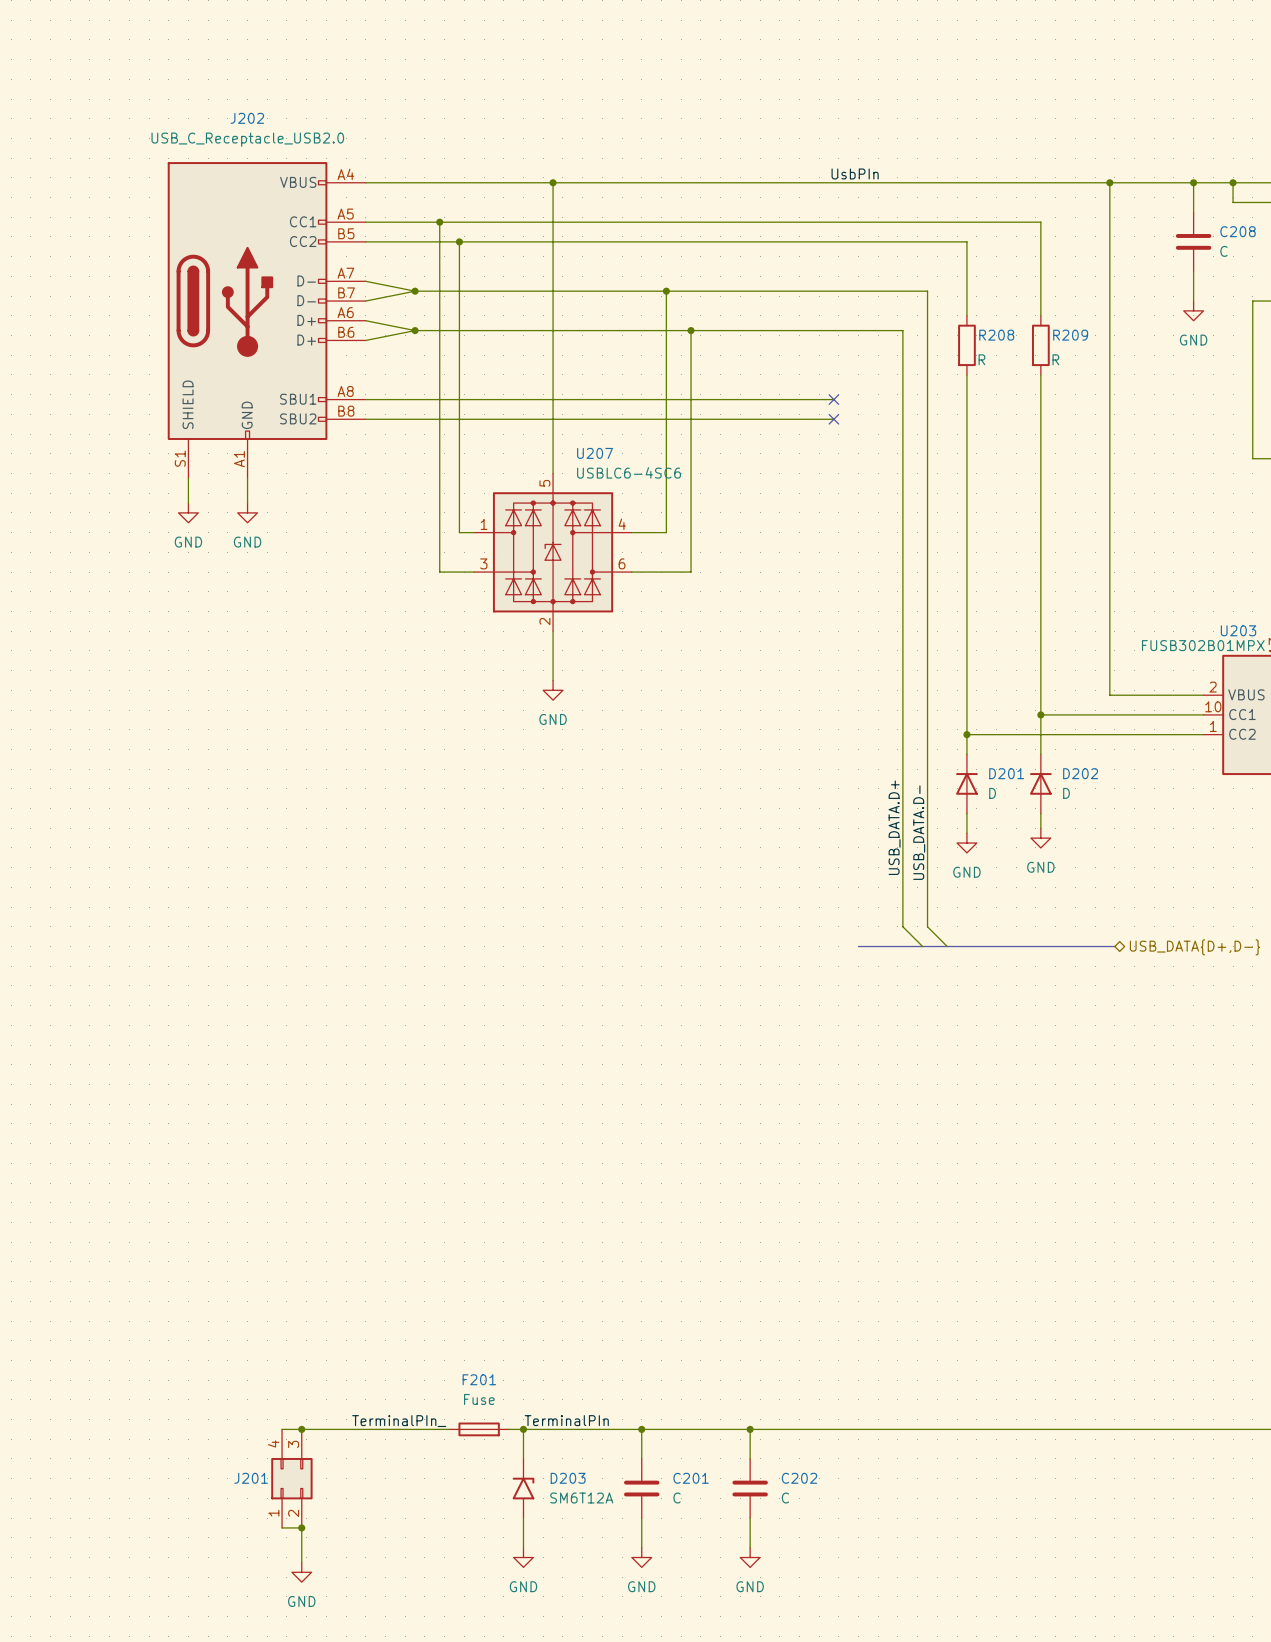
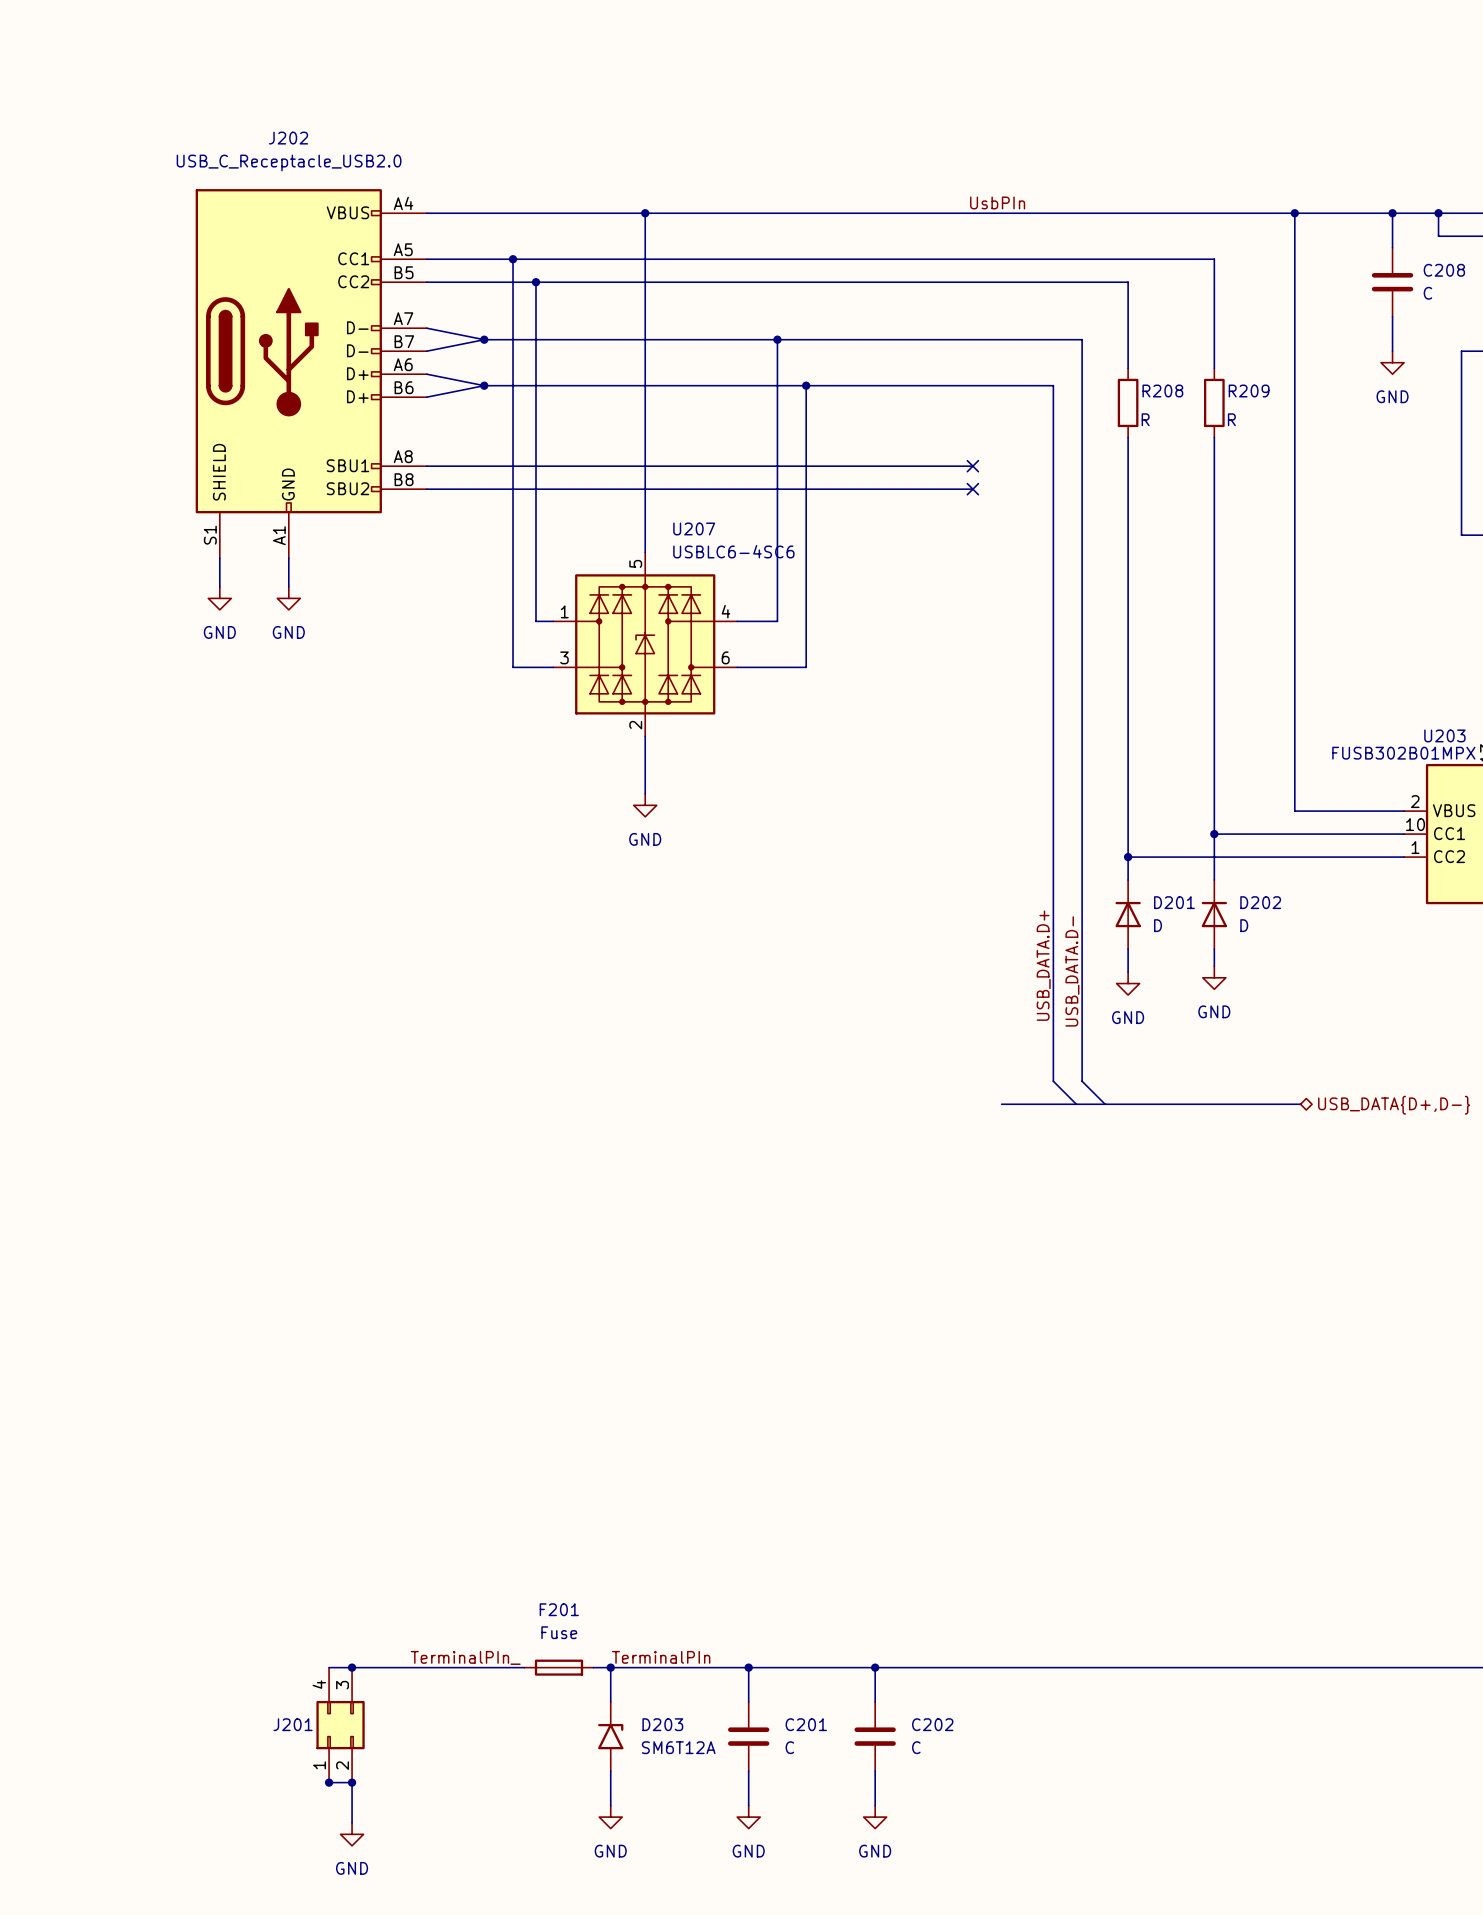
junction: none -> (329, 1782)

